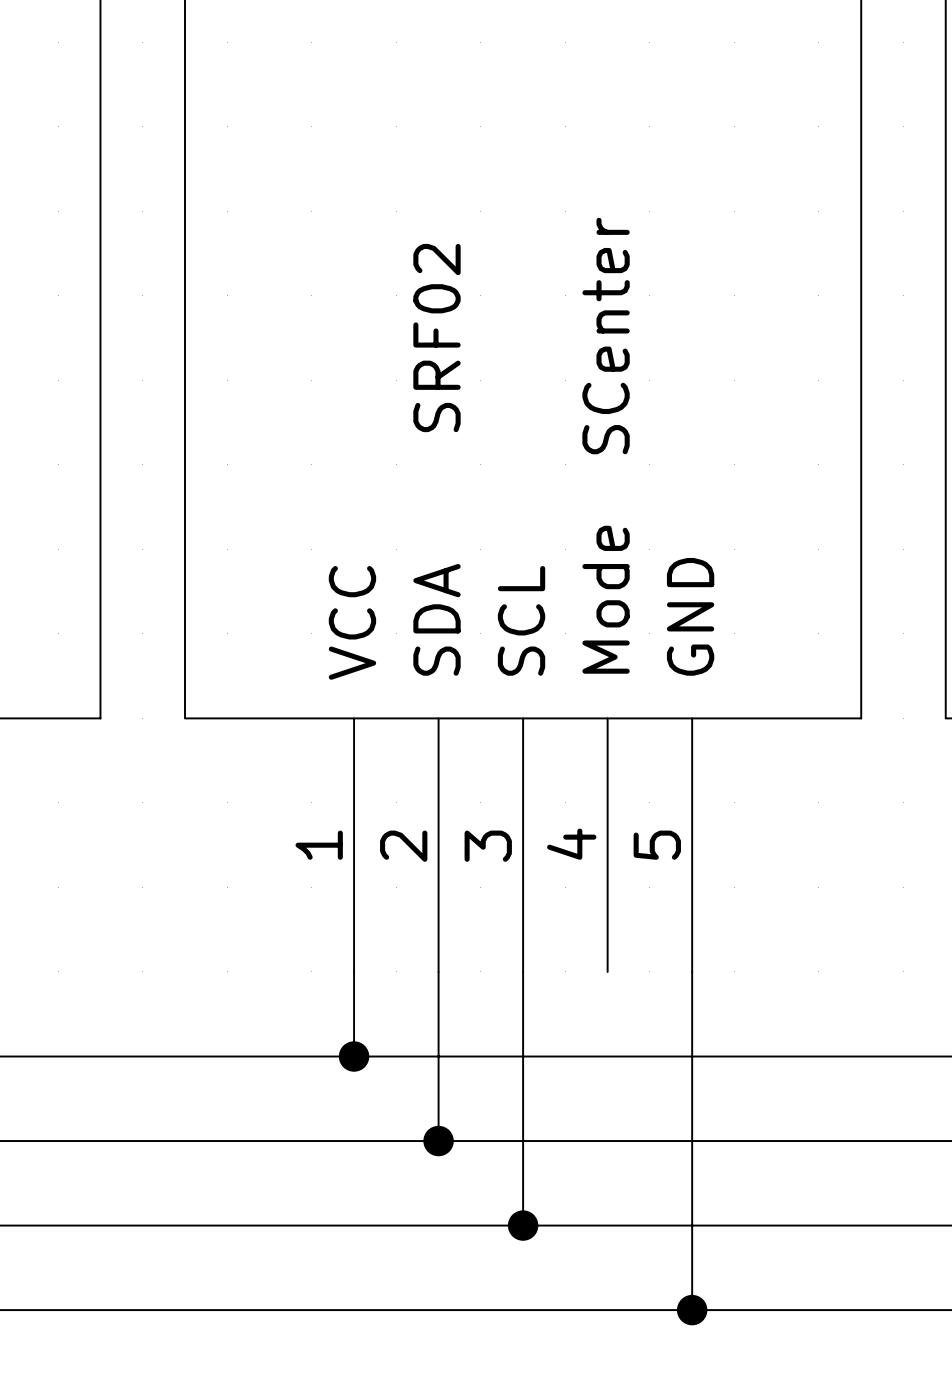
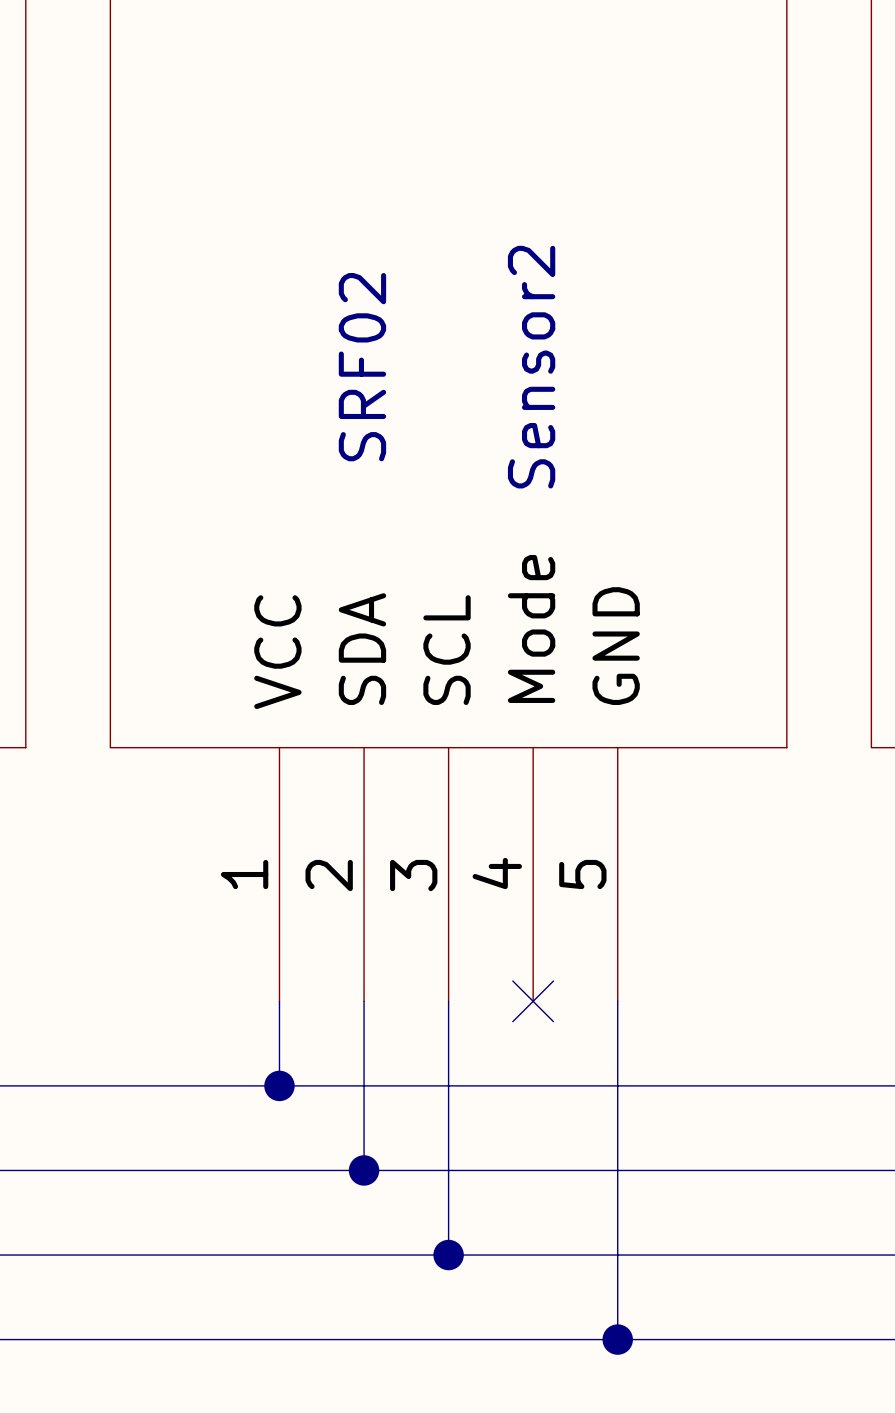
SCenter name: SCenter (606, 336) -> Sensor2 (531, 367)
no-connect mark: none -> (533, 1001)

